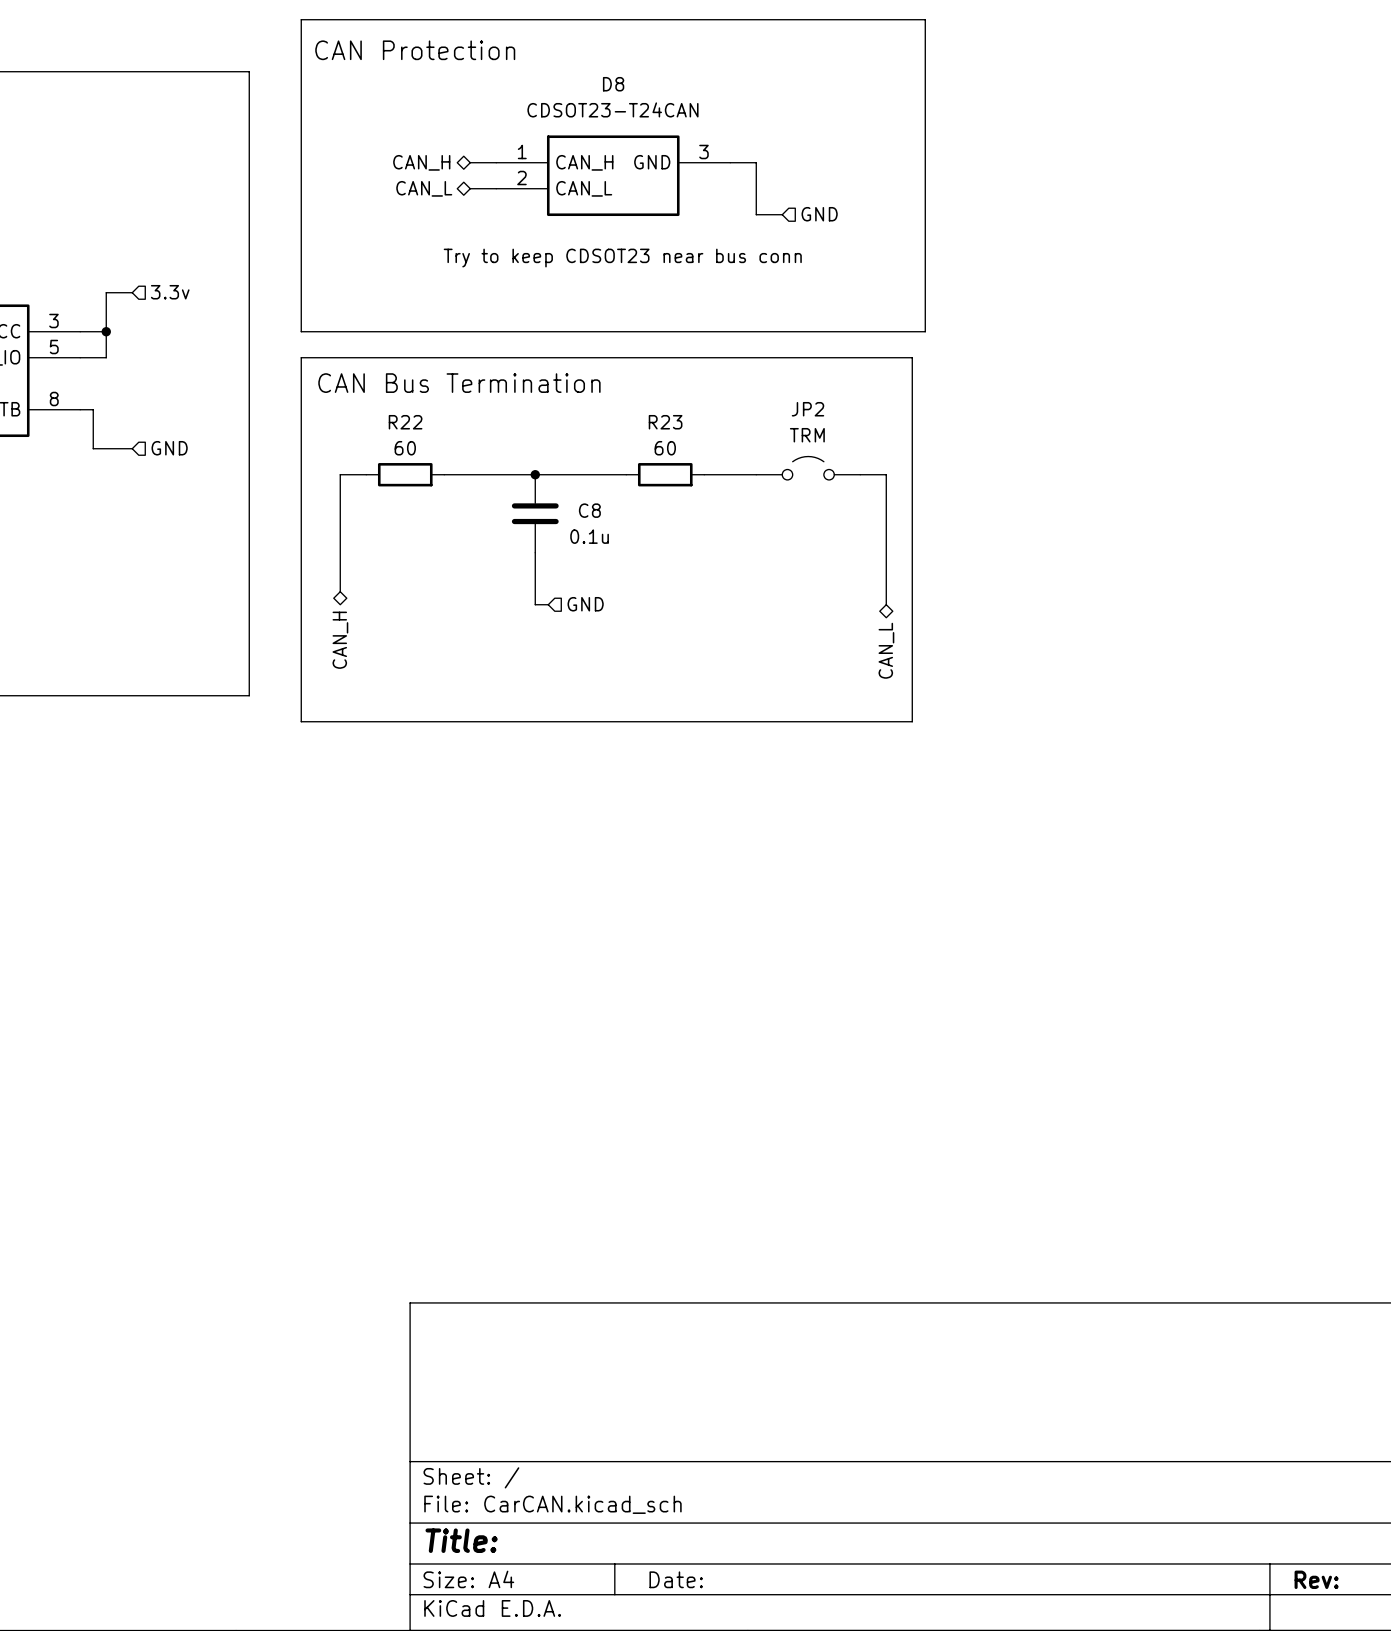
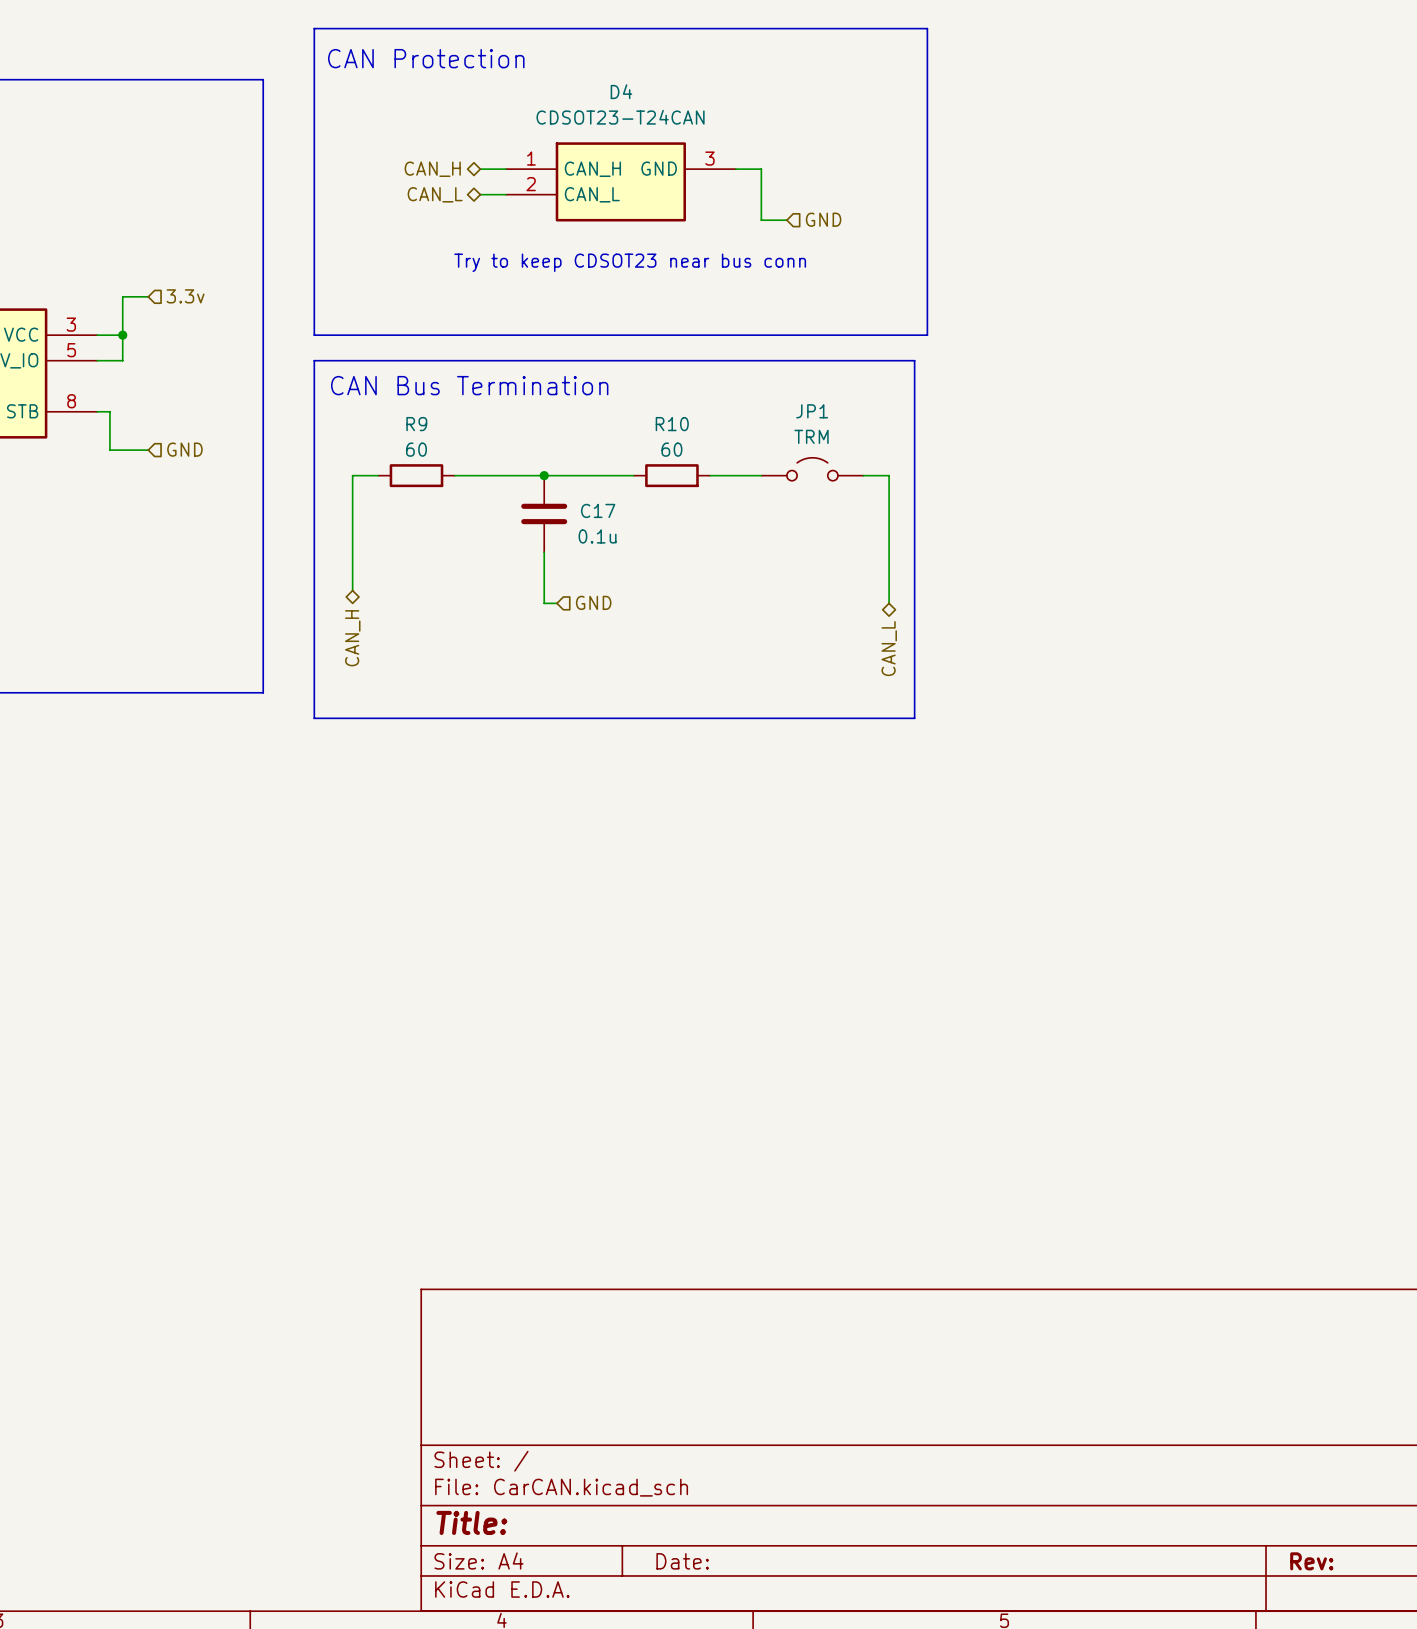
D8 name: D8 (613, 84) -> D4 (621, 91)
JP2 name: JP2 (807, 409) -> JP1 (812, 411)
R22 name: R22 (405, 422) -> R9 (416, 424)
R23 name: R23 (665, 422) -> R10 (672, 424)
C8 name: C8 (589, 510) -> C17 (598, 510)

